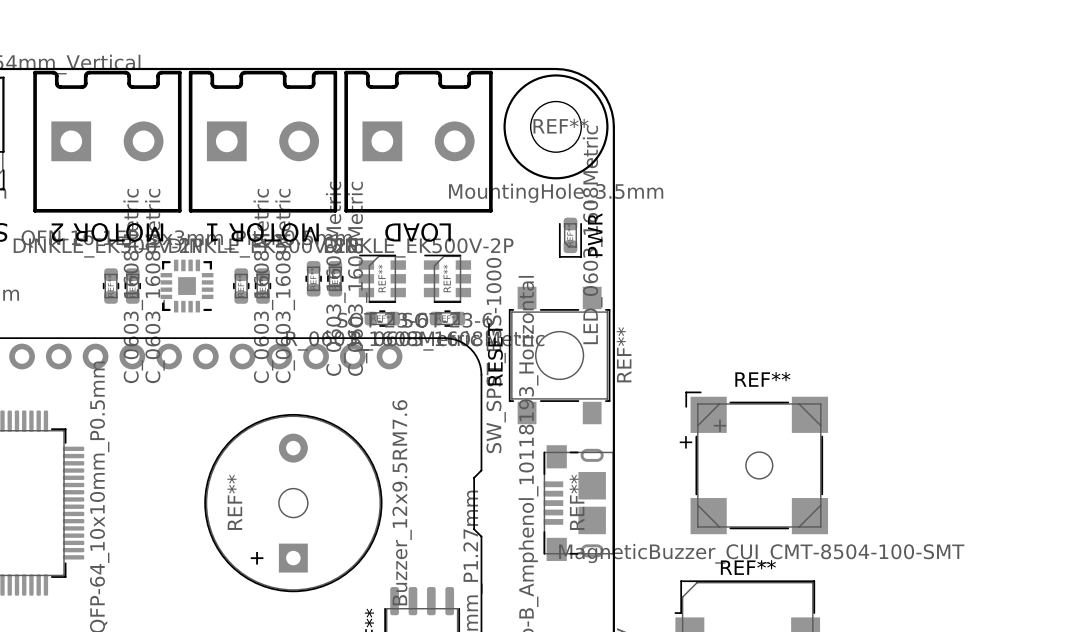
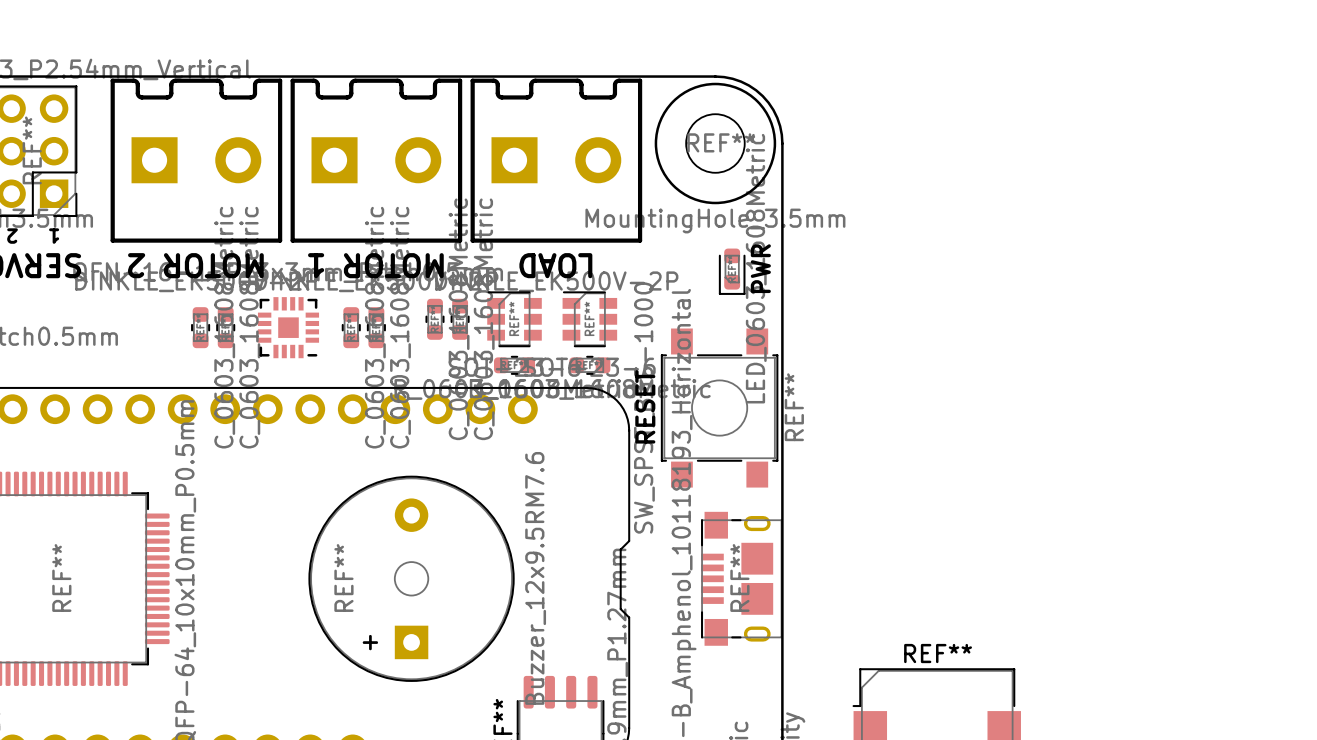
REF**: MagneticBuzzer_CUI_CMT-8504-100-SMT (756, 462) -> none

